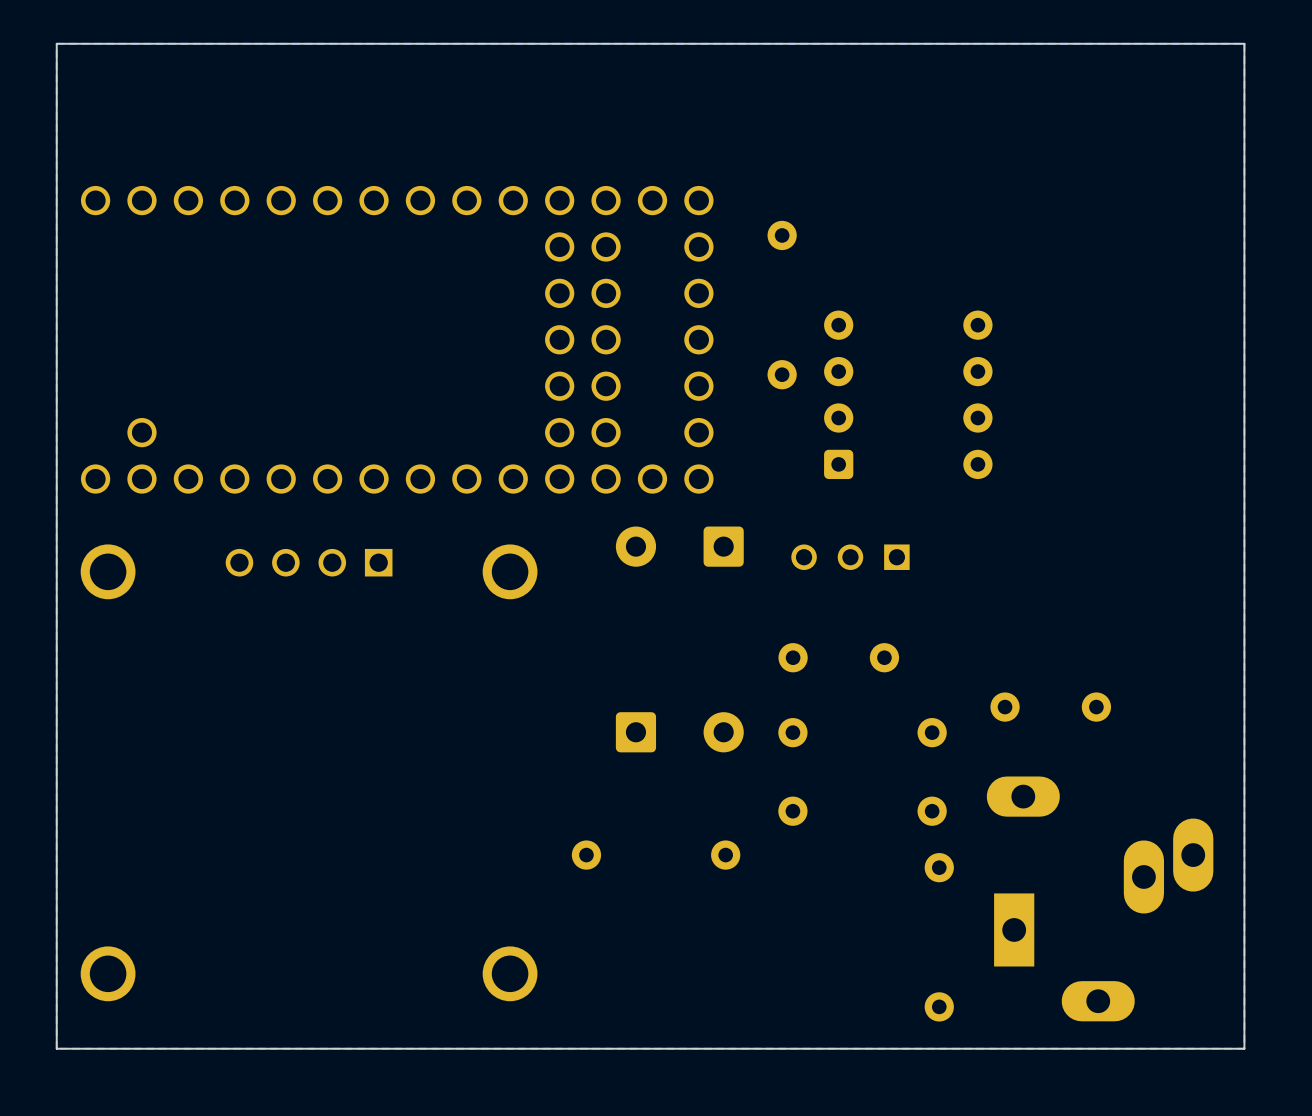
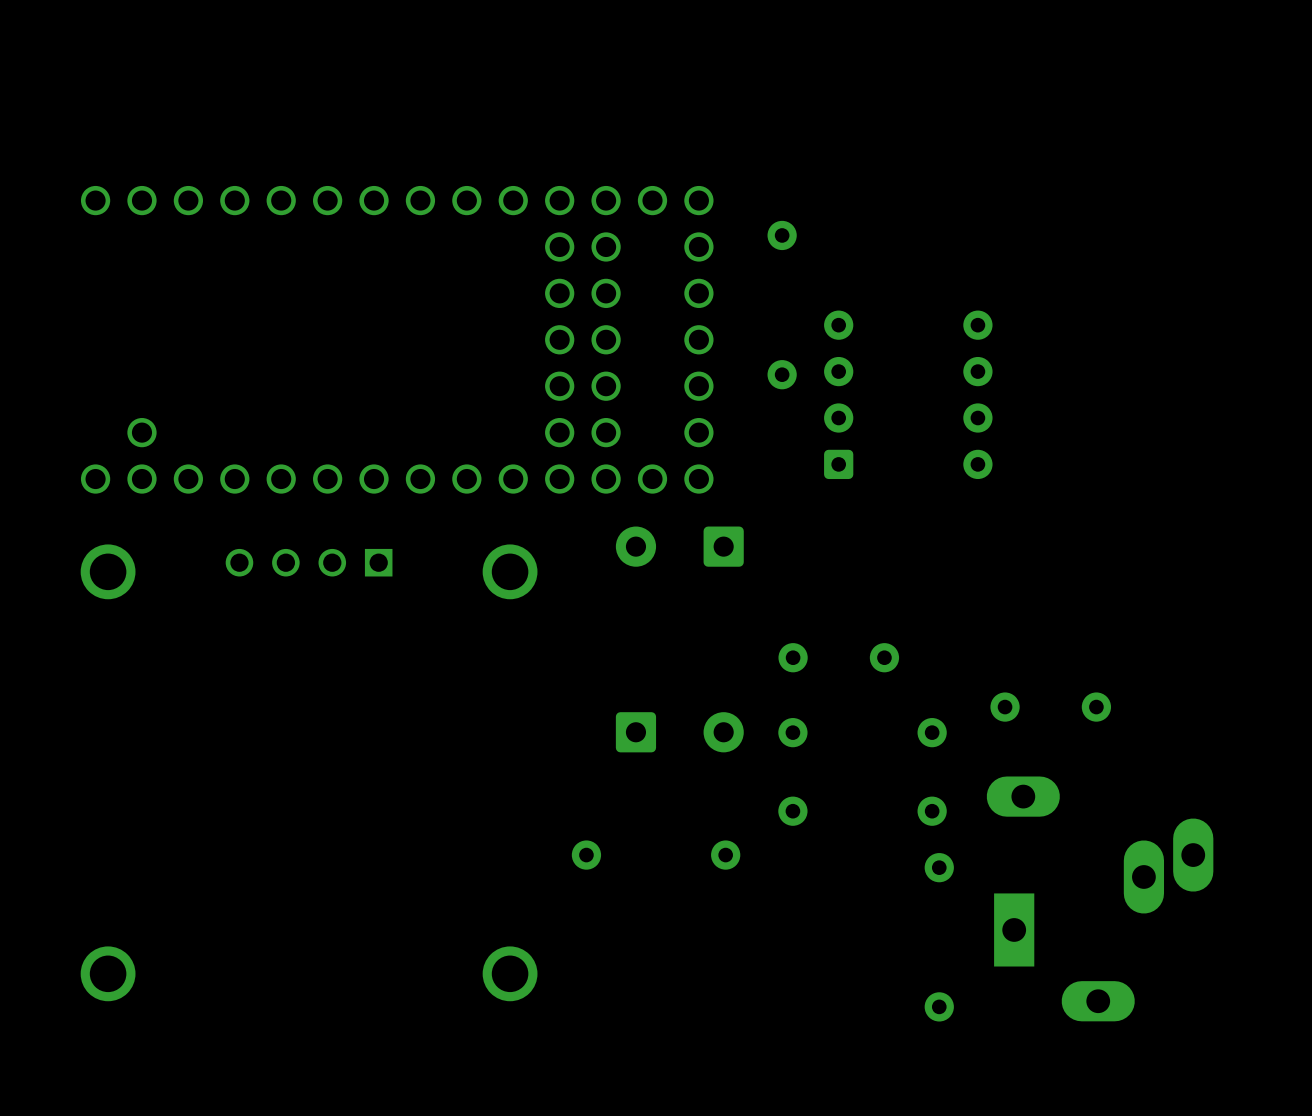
board edge: (1244, 43) (56, 43) (56, 1048) (1244, 1048) (1244, 43) -> none
part: (850, 557) -> none

